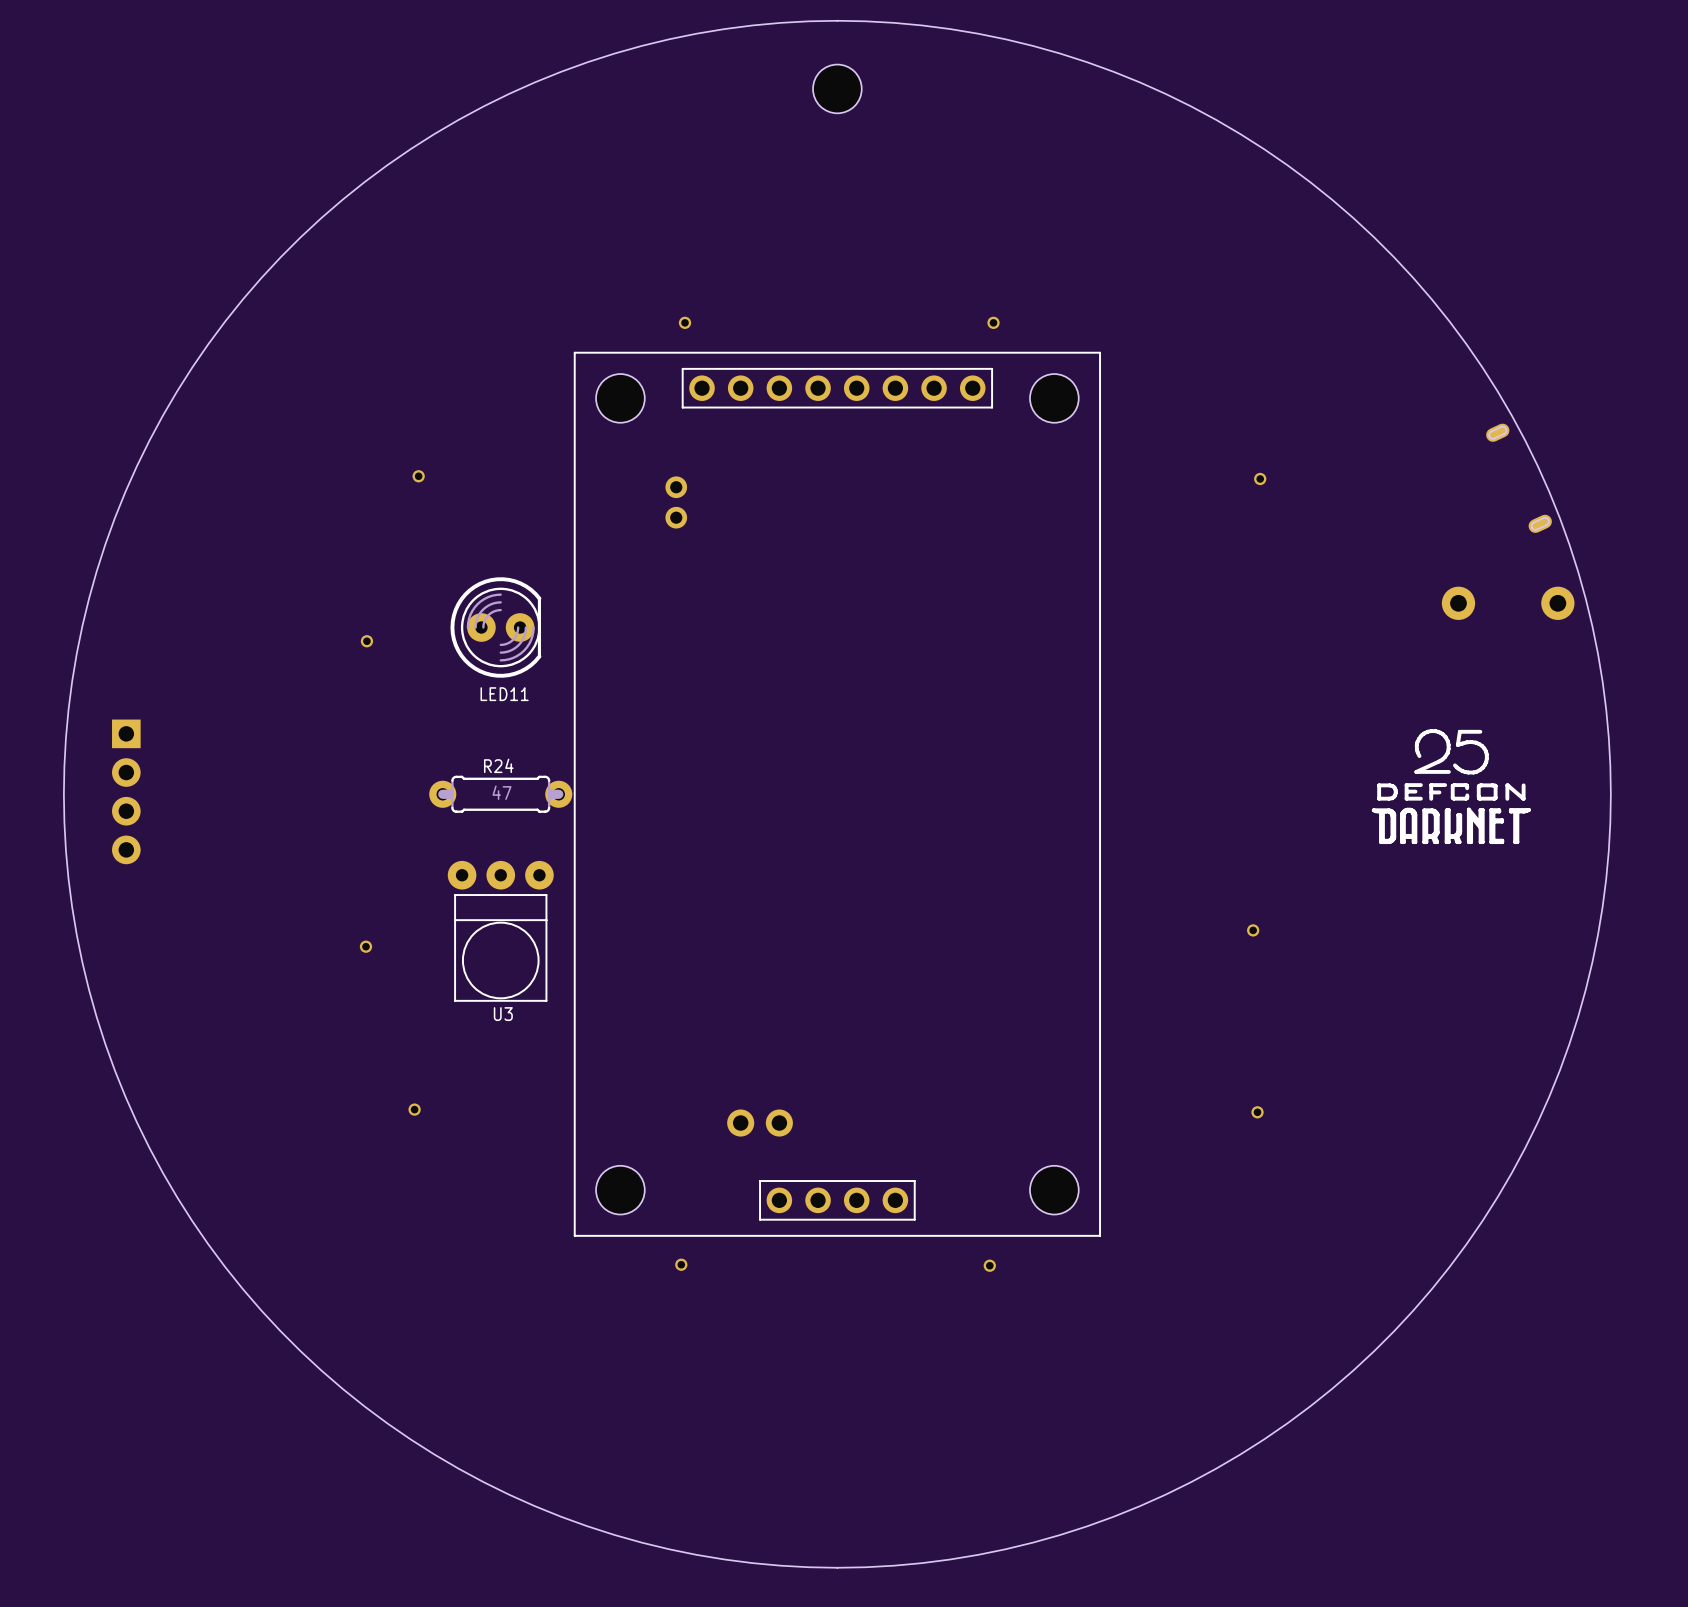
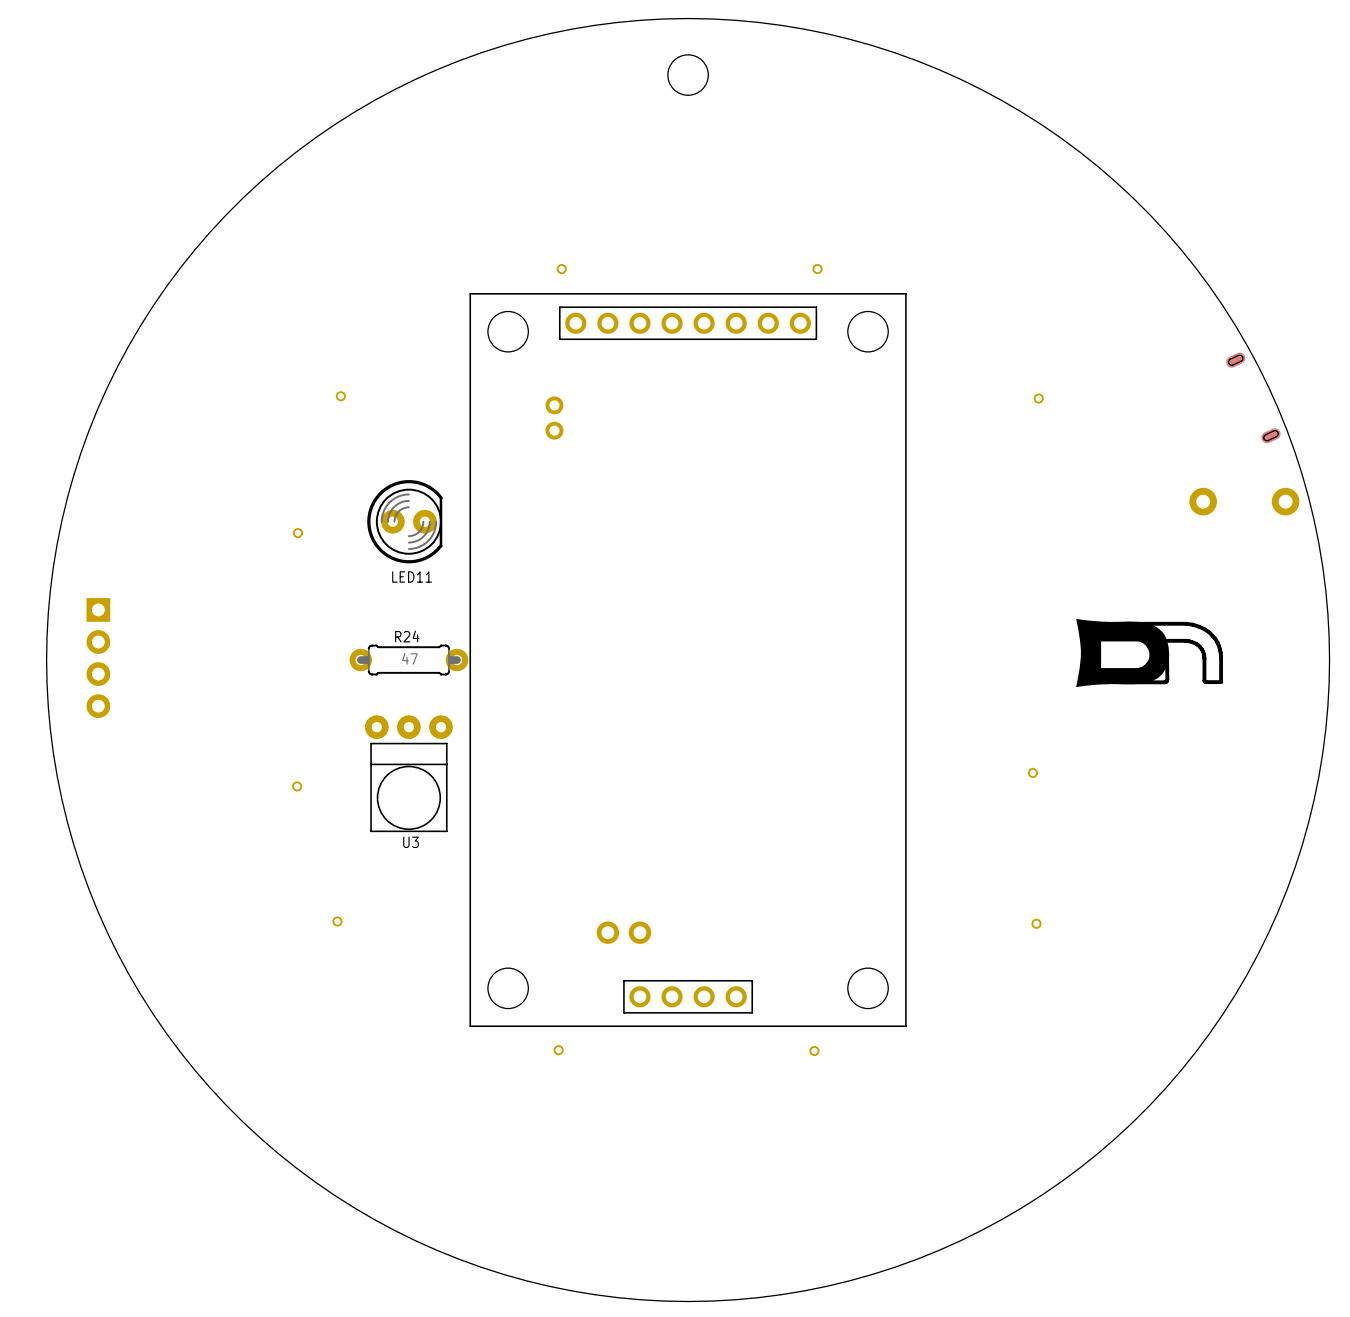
drawing: [1371, 729, 1531, 845] -> none
drawing: none -> [1076, 618, 1224, 688]

